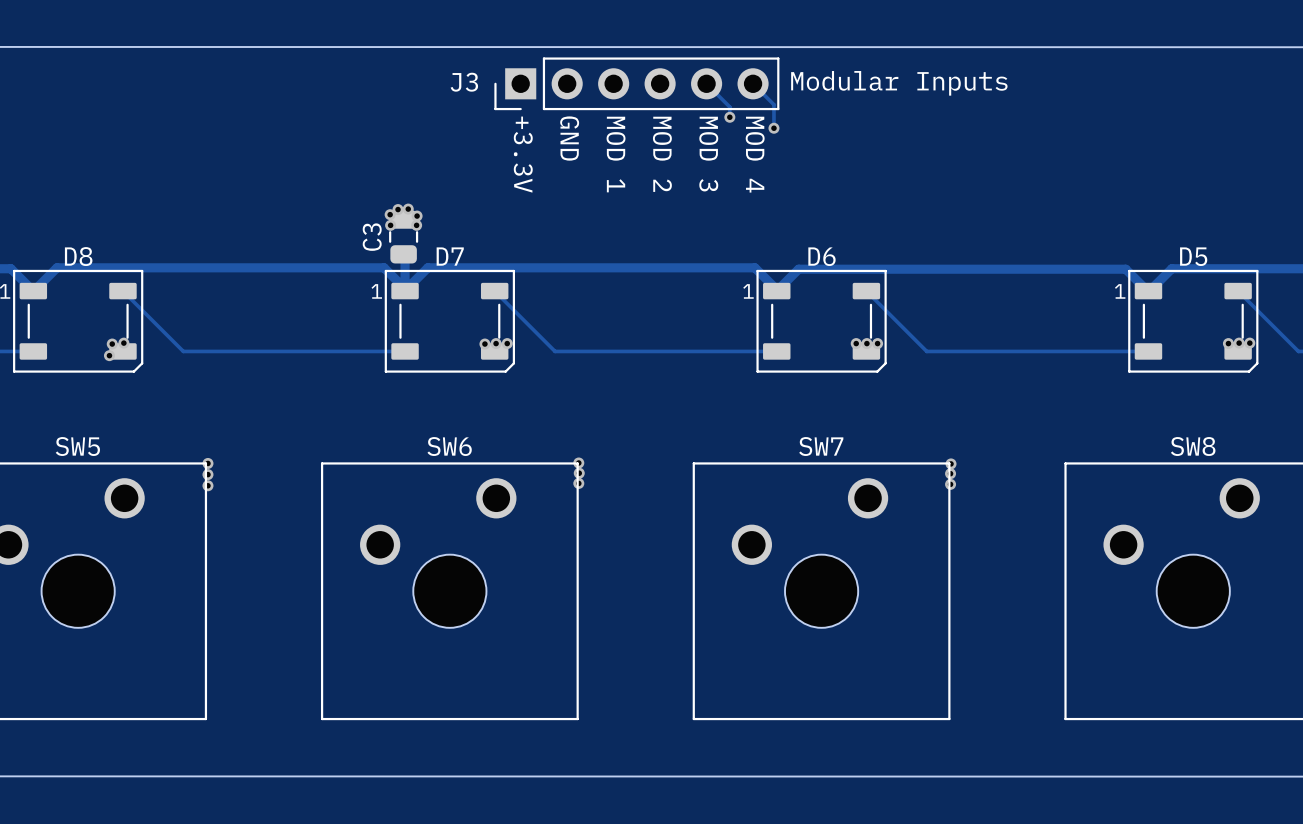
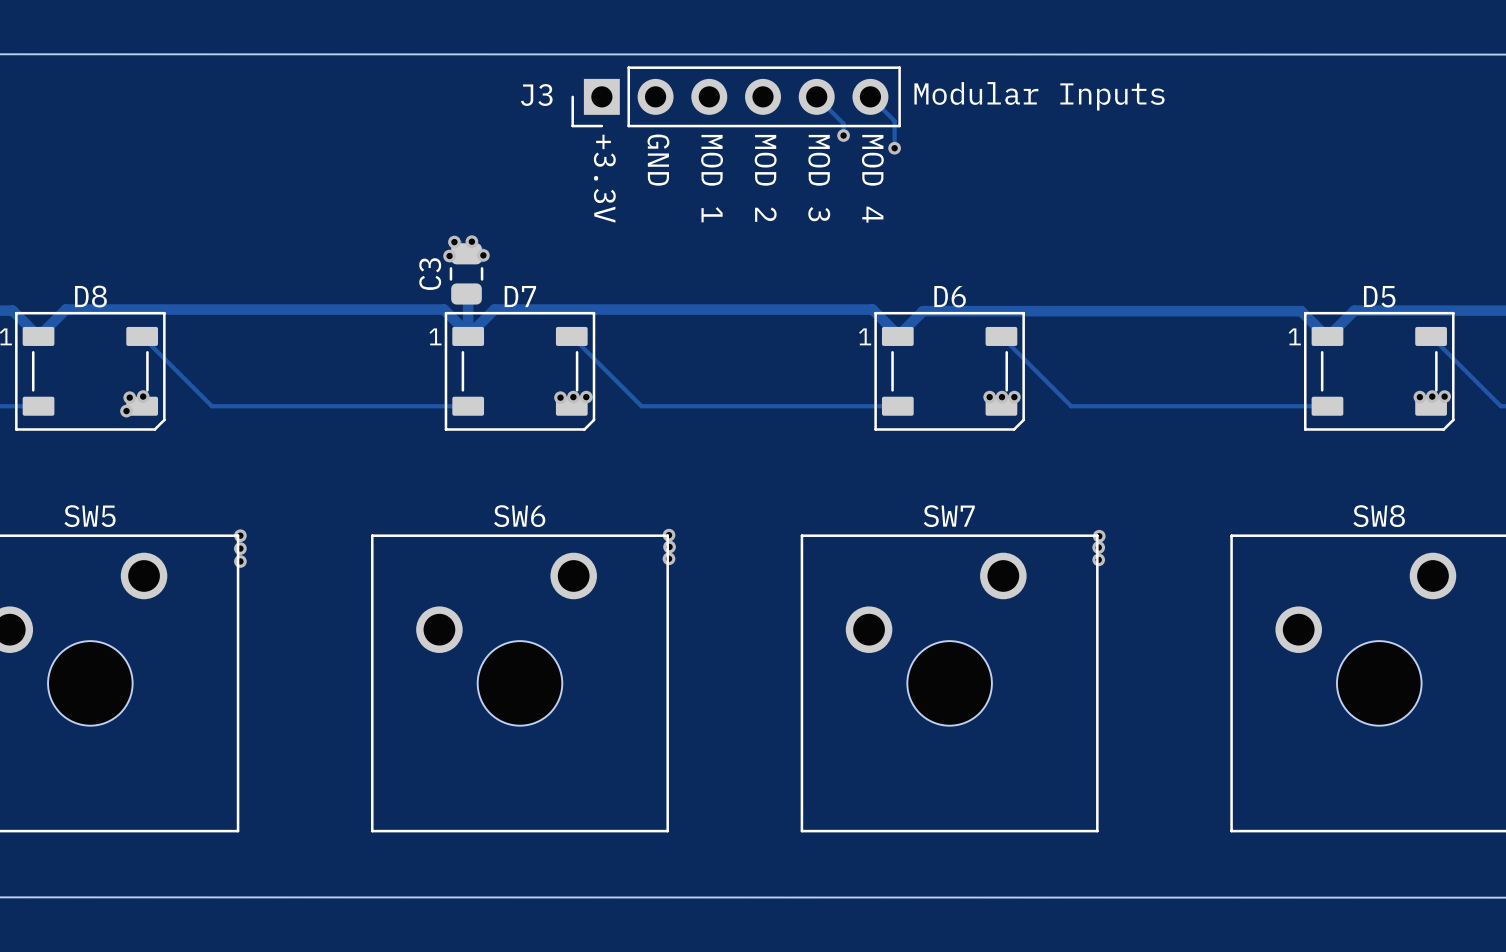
via: none -> (454, 242)
via: (398, 209) -> none
via: (390, 214) -> none
via: (417, 216) -> none
via: none -> (483, 255)
via: none -> (449, 256)
via: (390, 225) -> none
via: (416, 225) -> none

